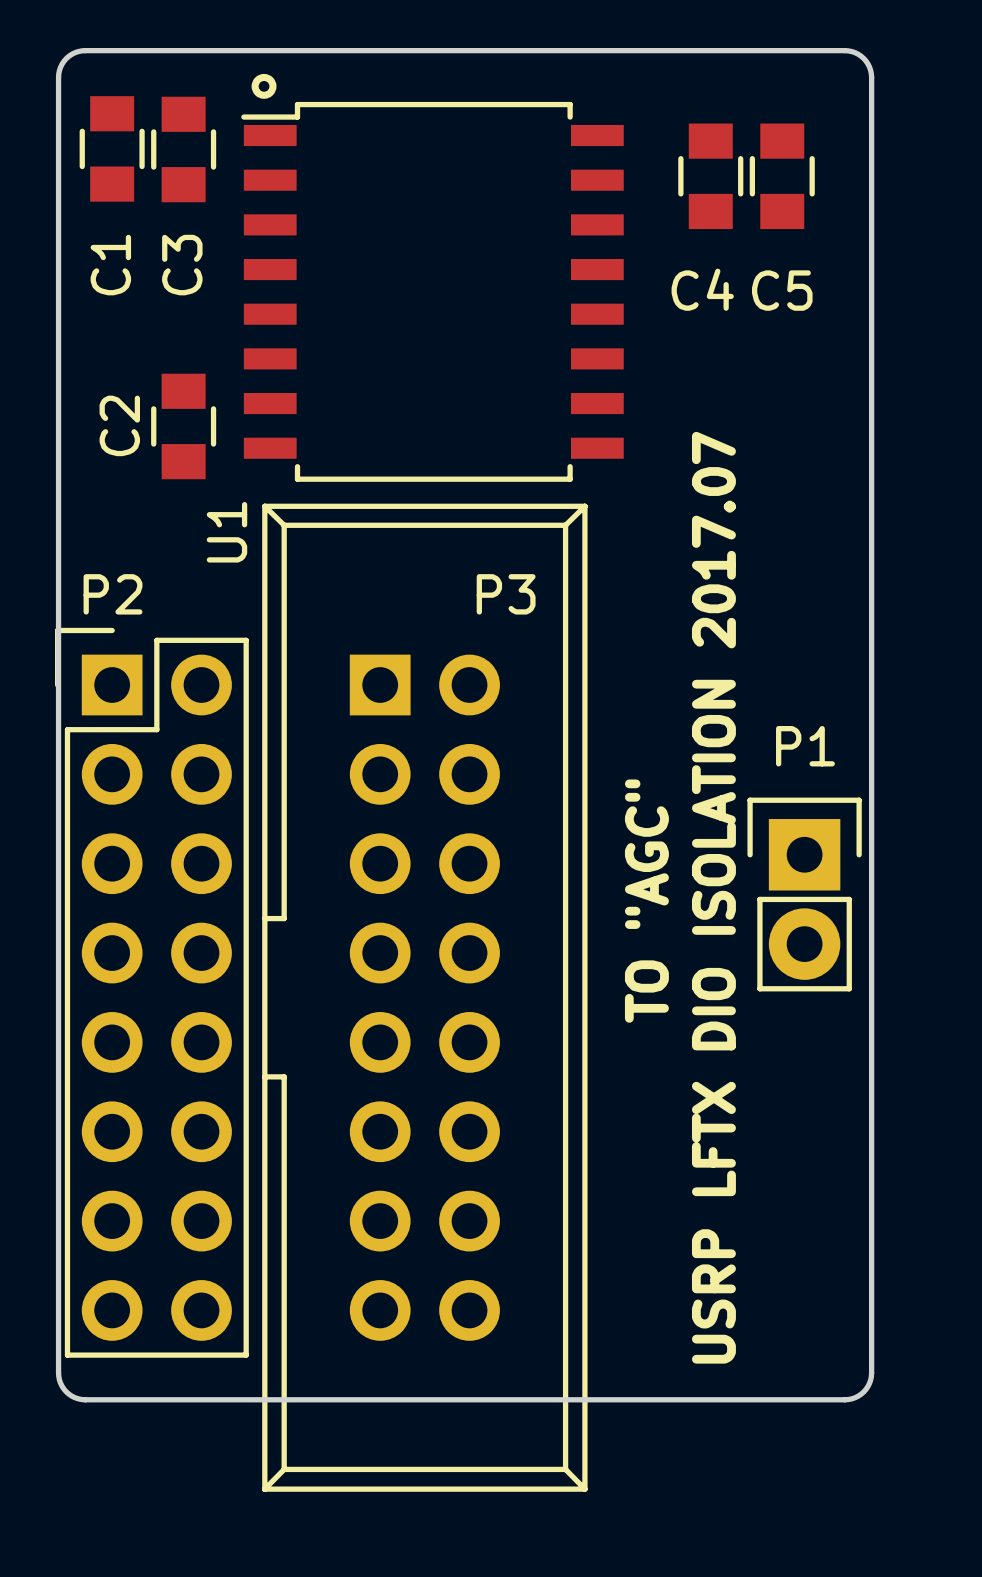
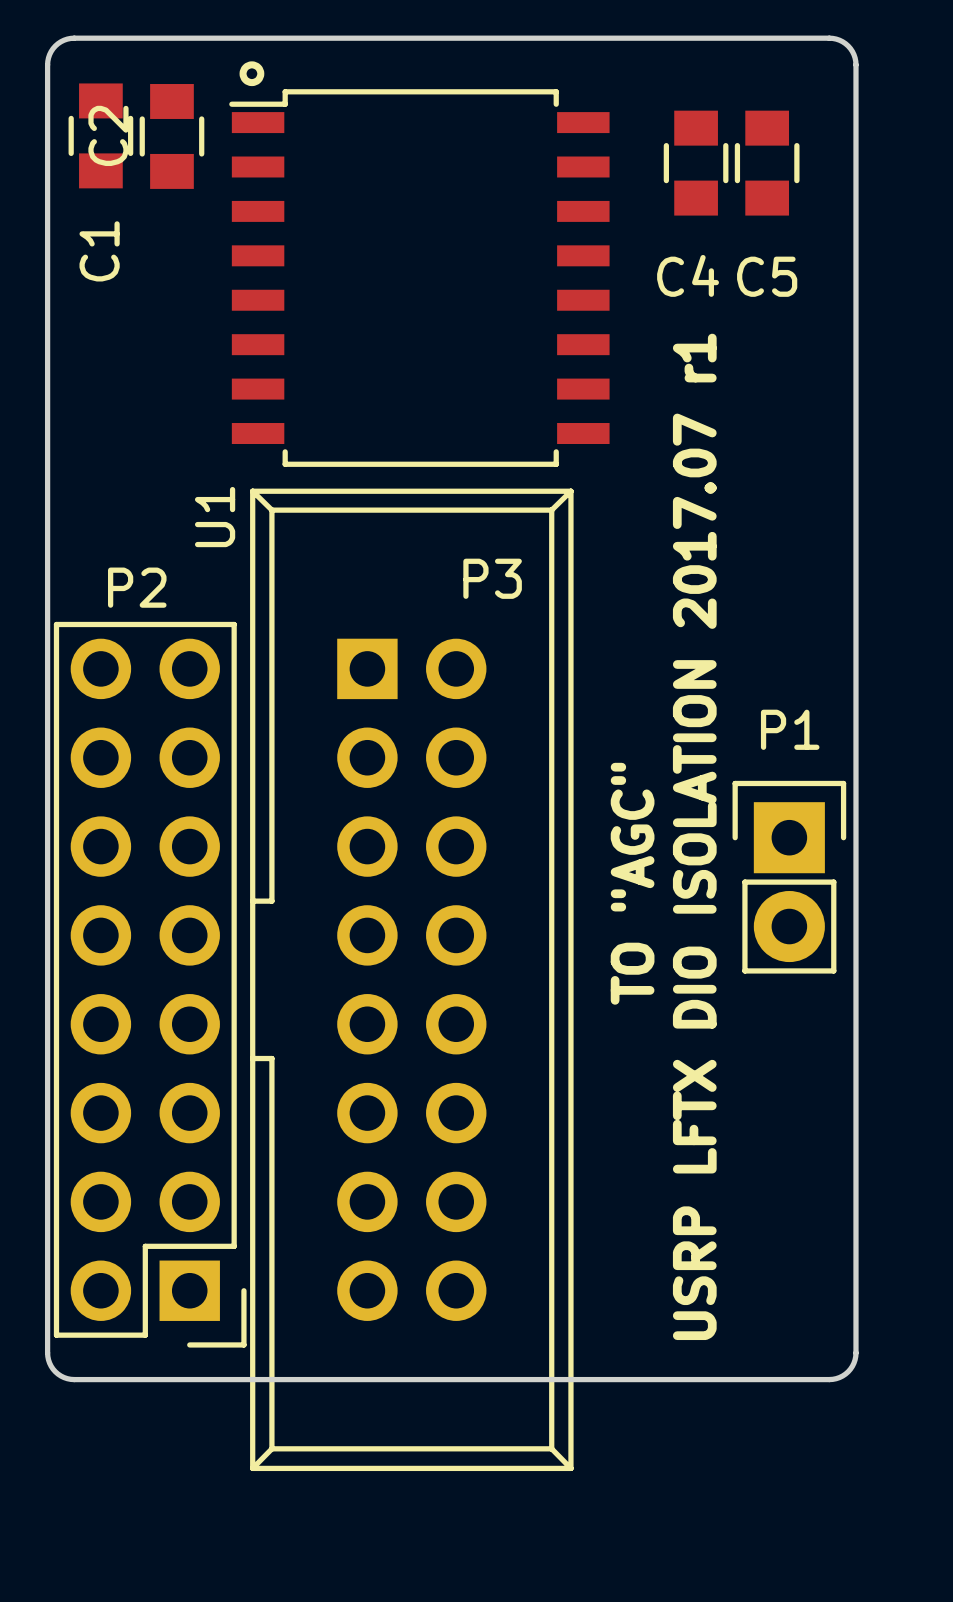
C3 name: C3 (182, 265) -> C2 (108, 135)
C2: (183, 426) -> none
text: USRP LFTX DIO ISOLATION 2017.07 (713, 897) -> USRP LFTX DIO ISOLATION 2017.07 r1 (694, 836)
P2 rotation: 0° (151, 992) -> 180° (150, 984)

